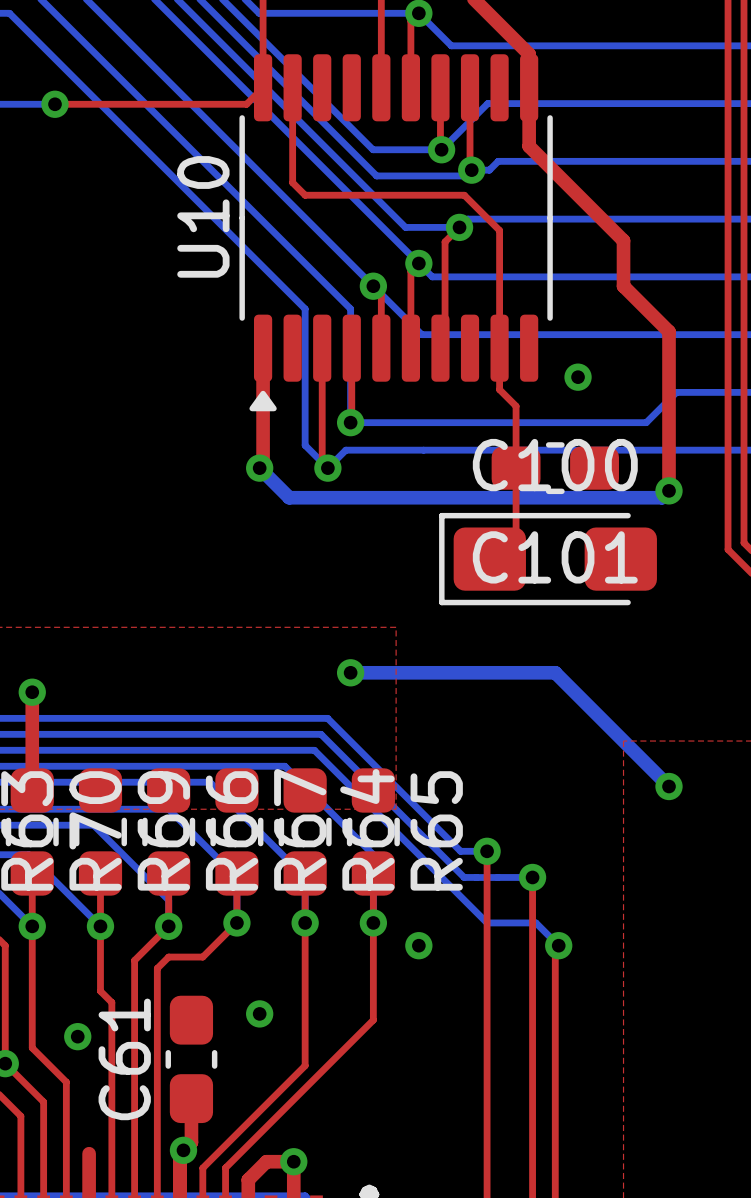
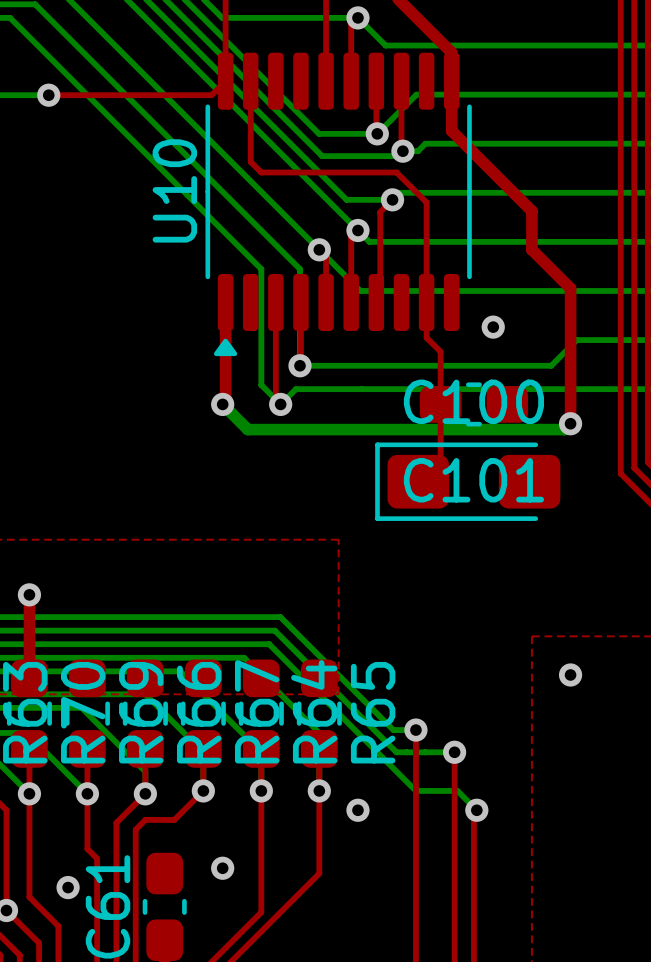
bottom track: (350, 672) (555, 672) (669, 786) -> none
via: (350, 672) -> none

